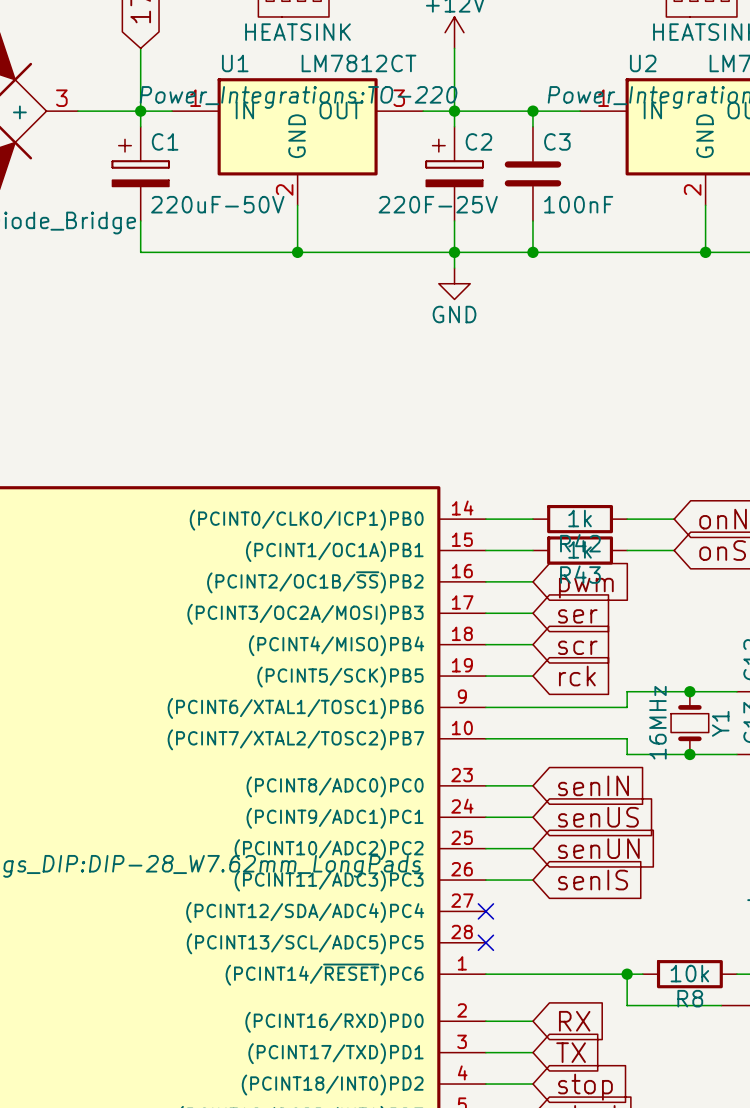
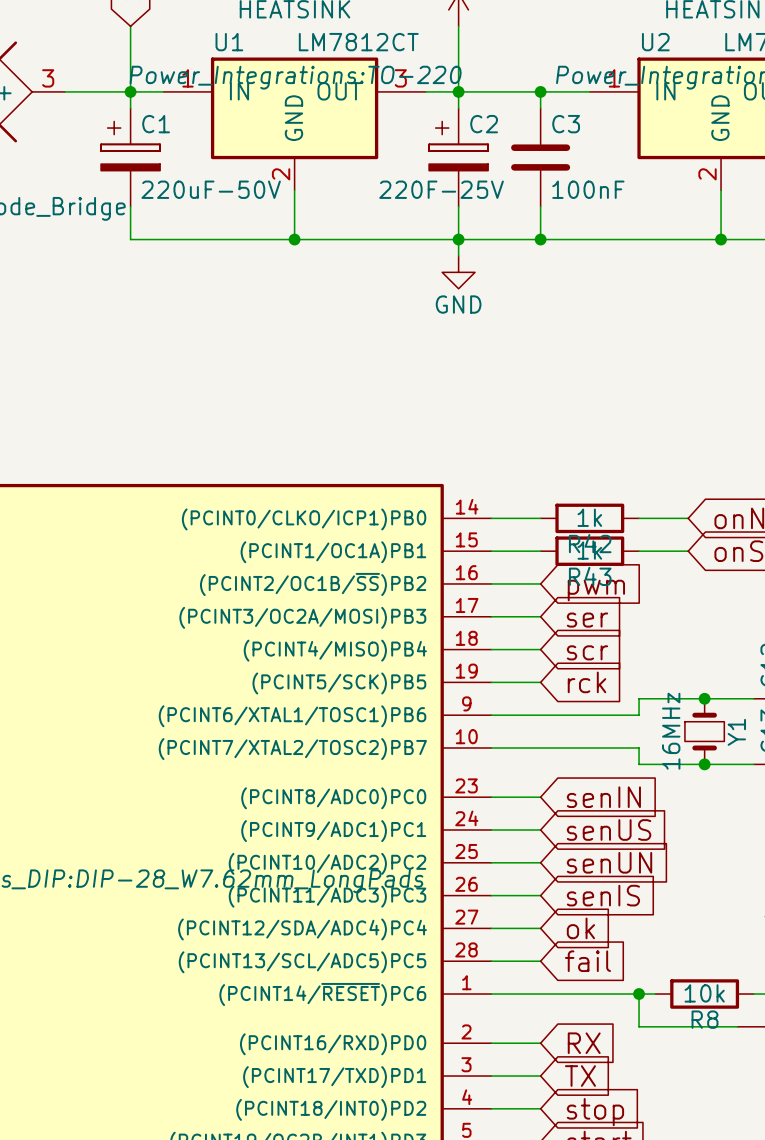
wire: none -> (491, 928) (540, 928)
no-connect mark: (485, 911) -> none
global label: none -> ok (580, 928)
wire: none -> (491, 961) (540, 961)
no-connect mark: (485, 942) -> none
global label: none -> fail (587, 961)

